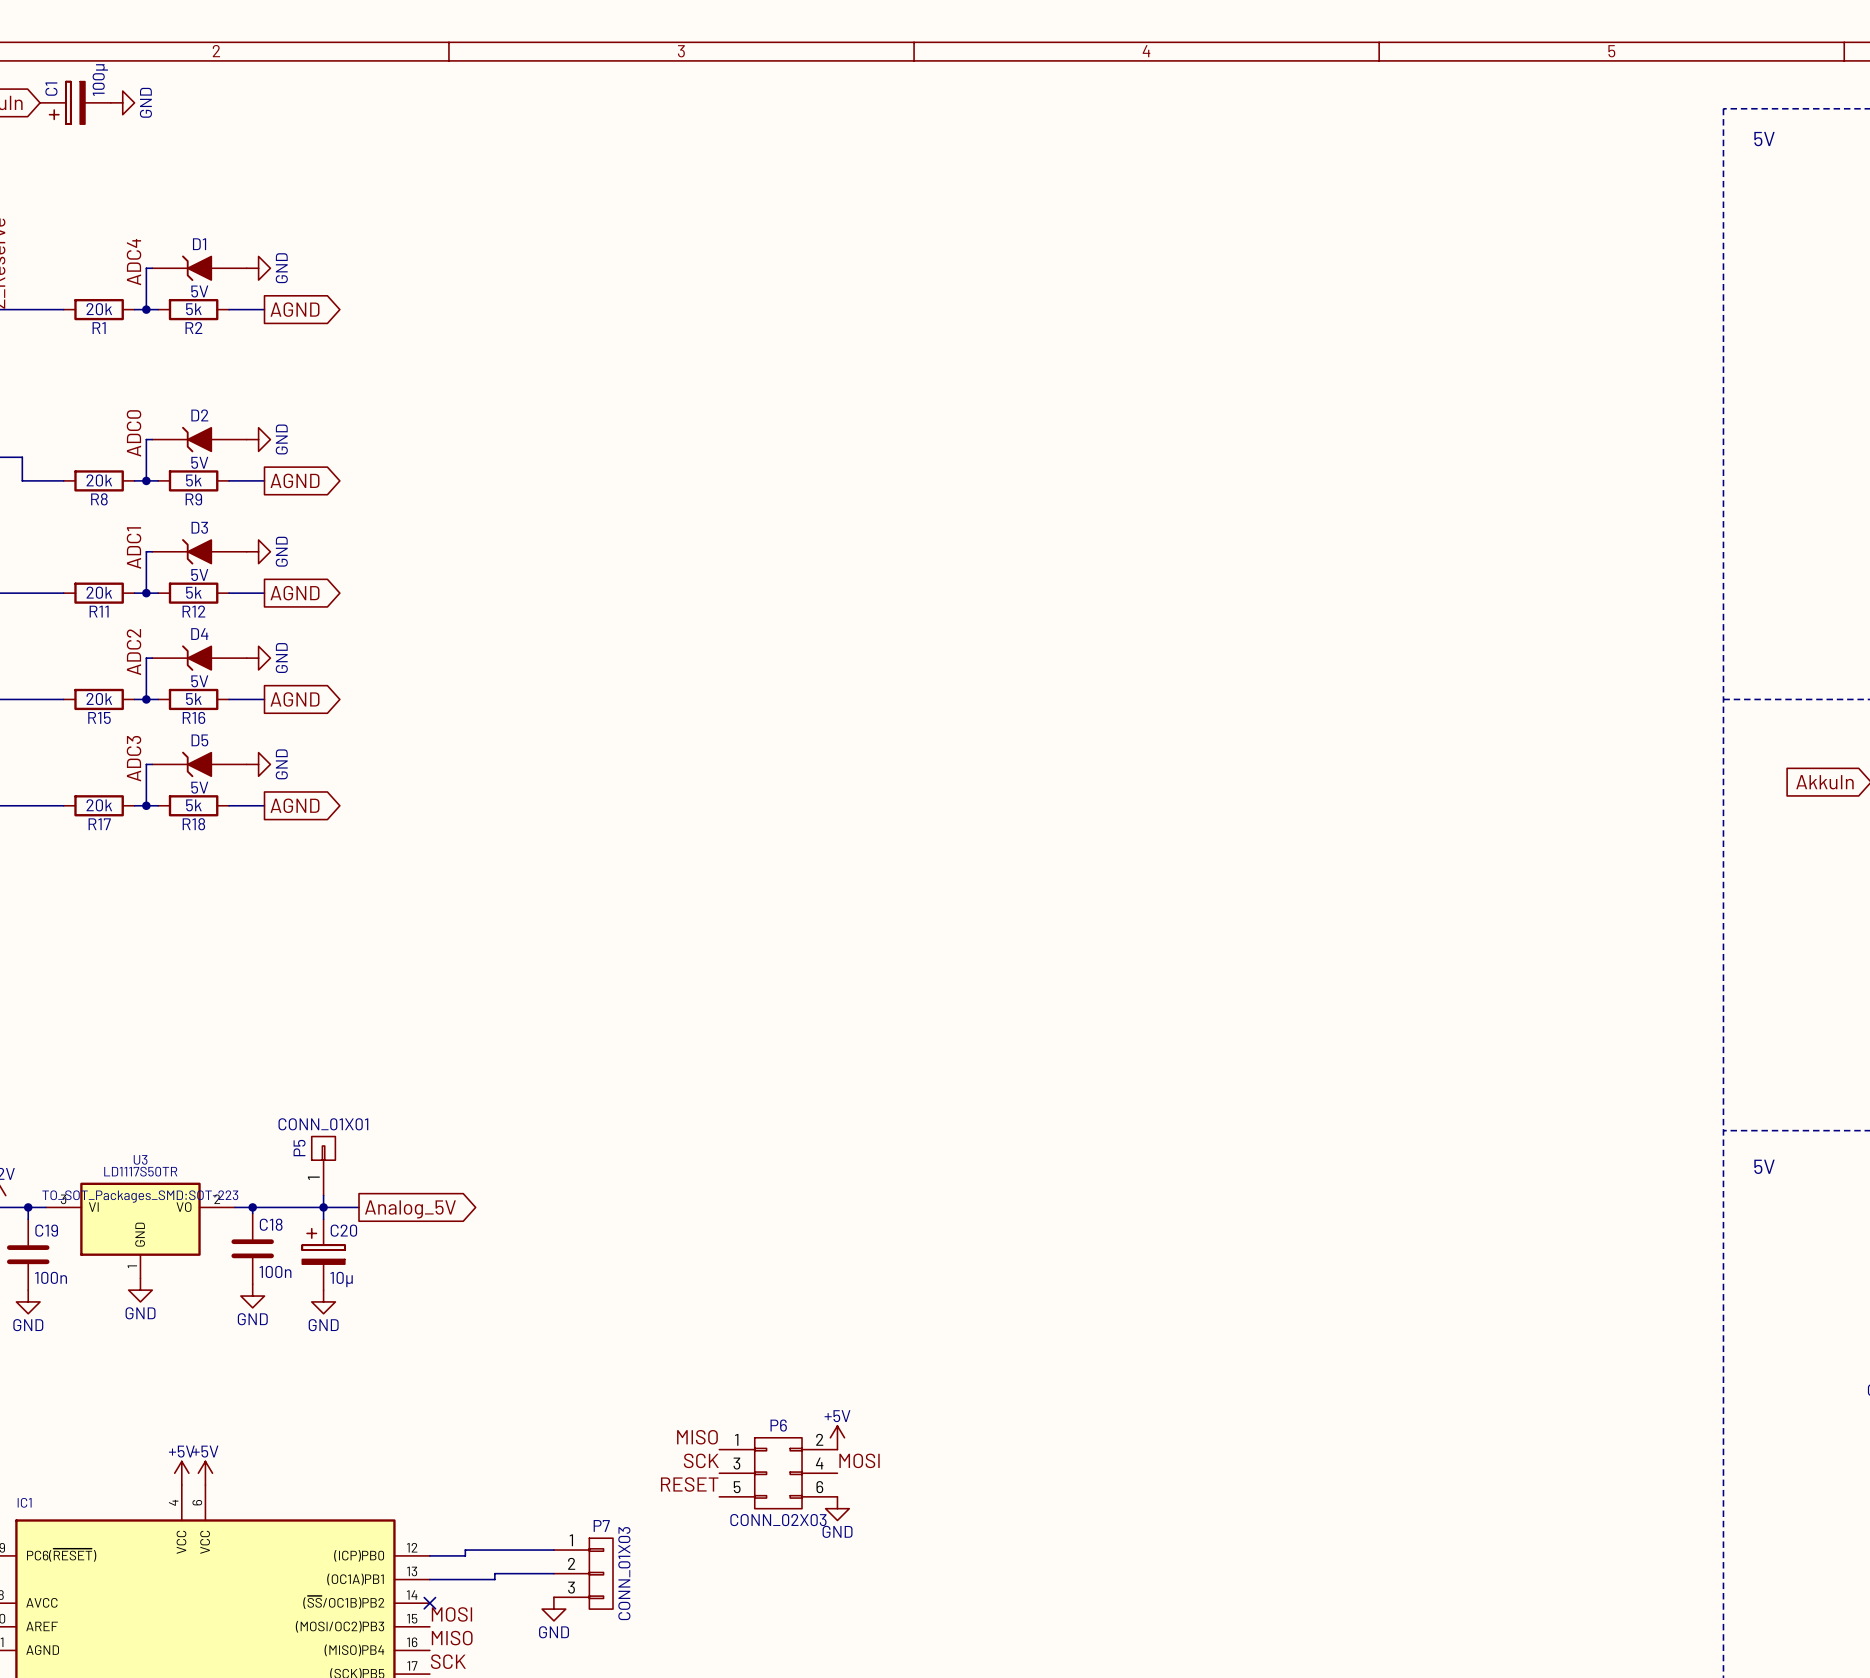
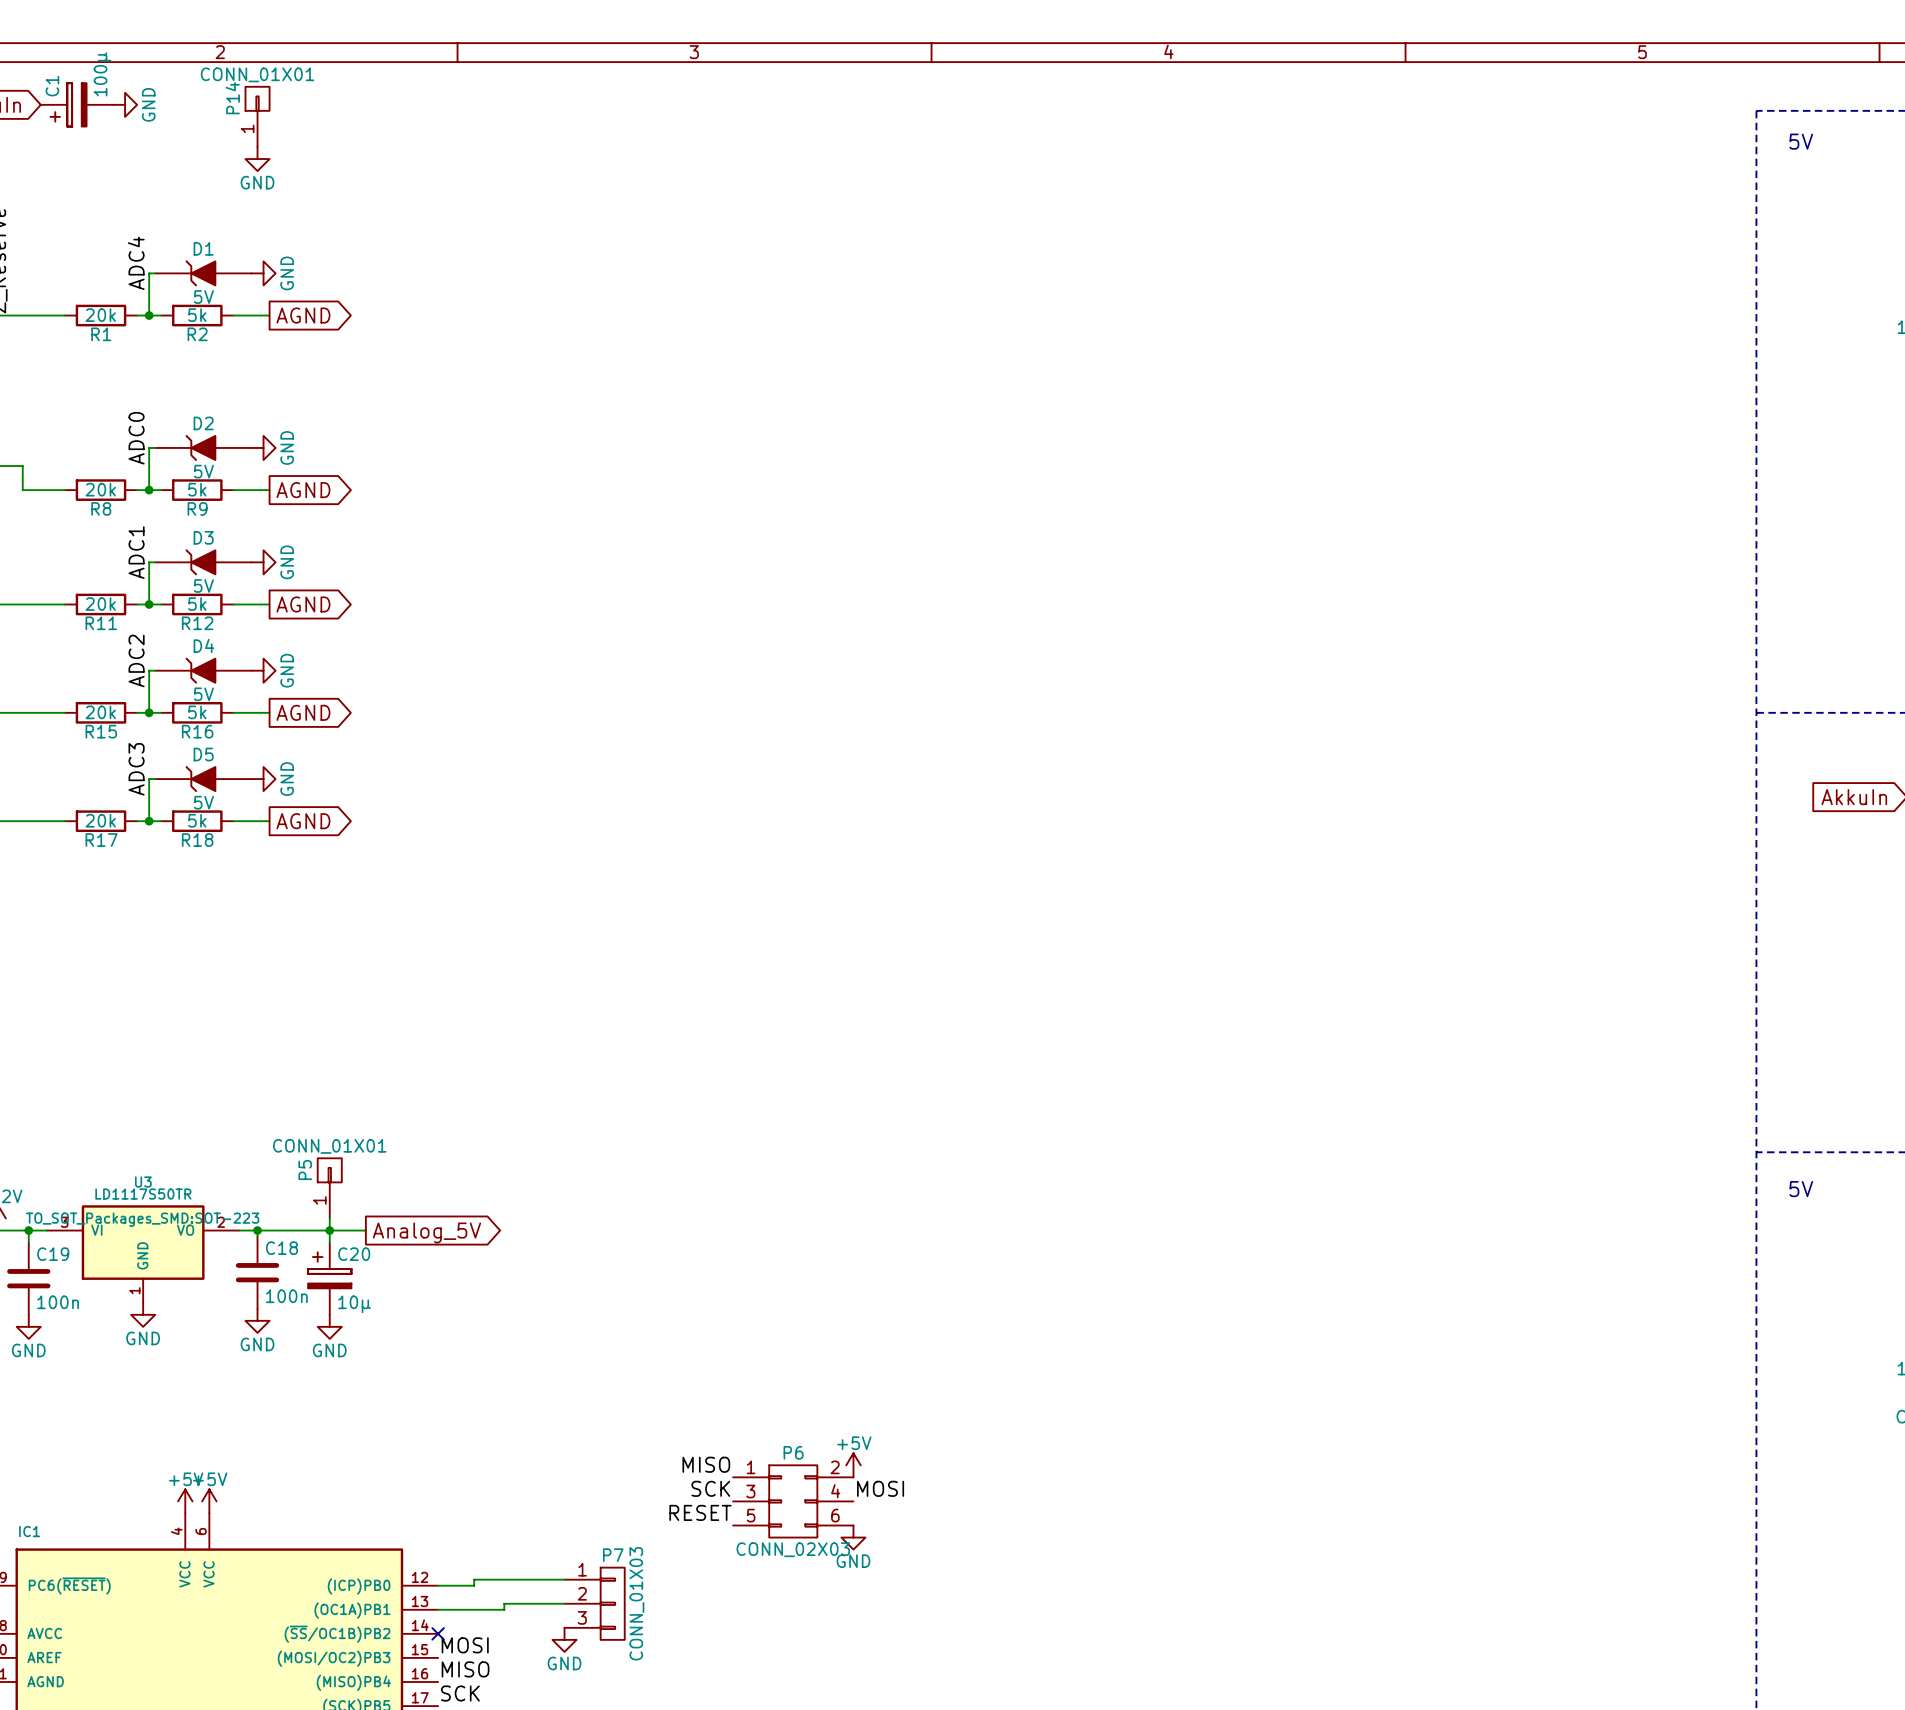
P14: none -> CONN_01X01 (257, 116)
power symbol: none -> GND (257, 159)

